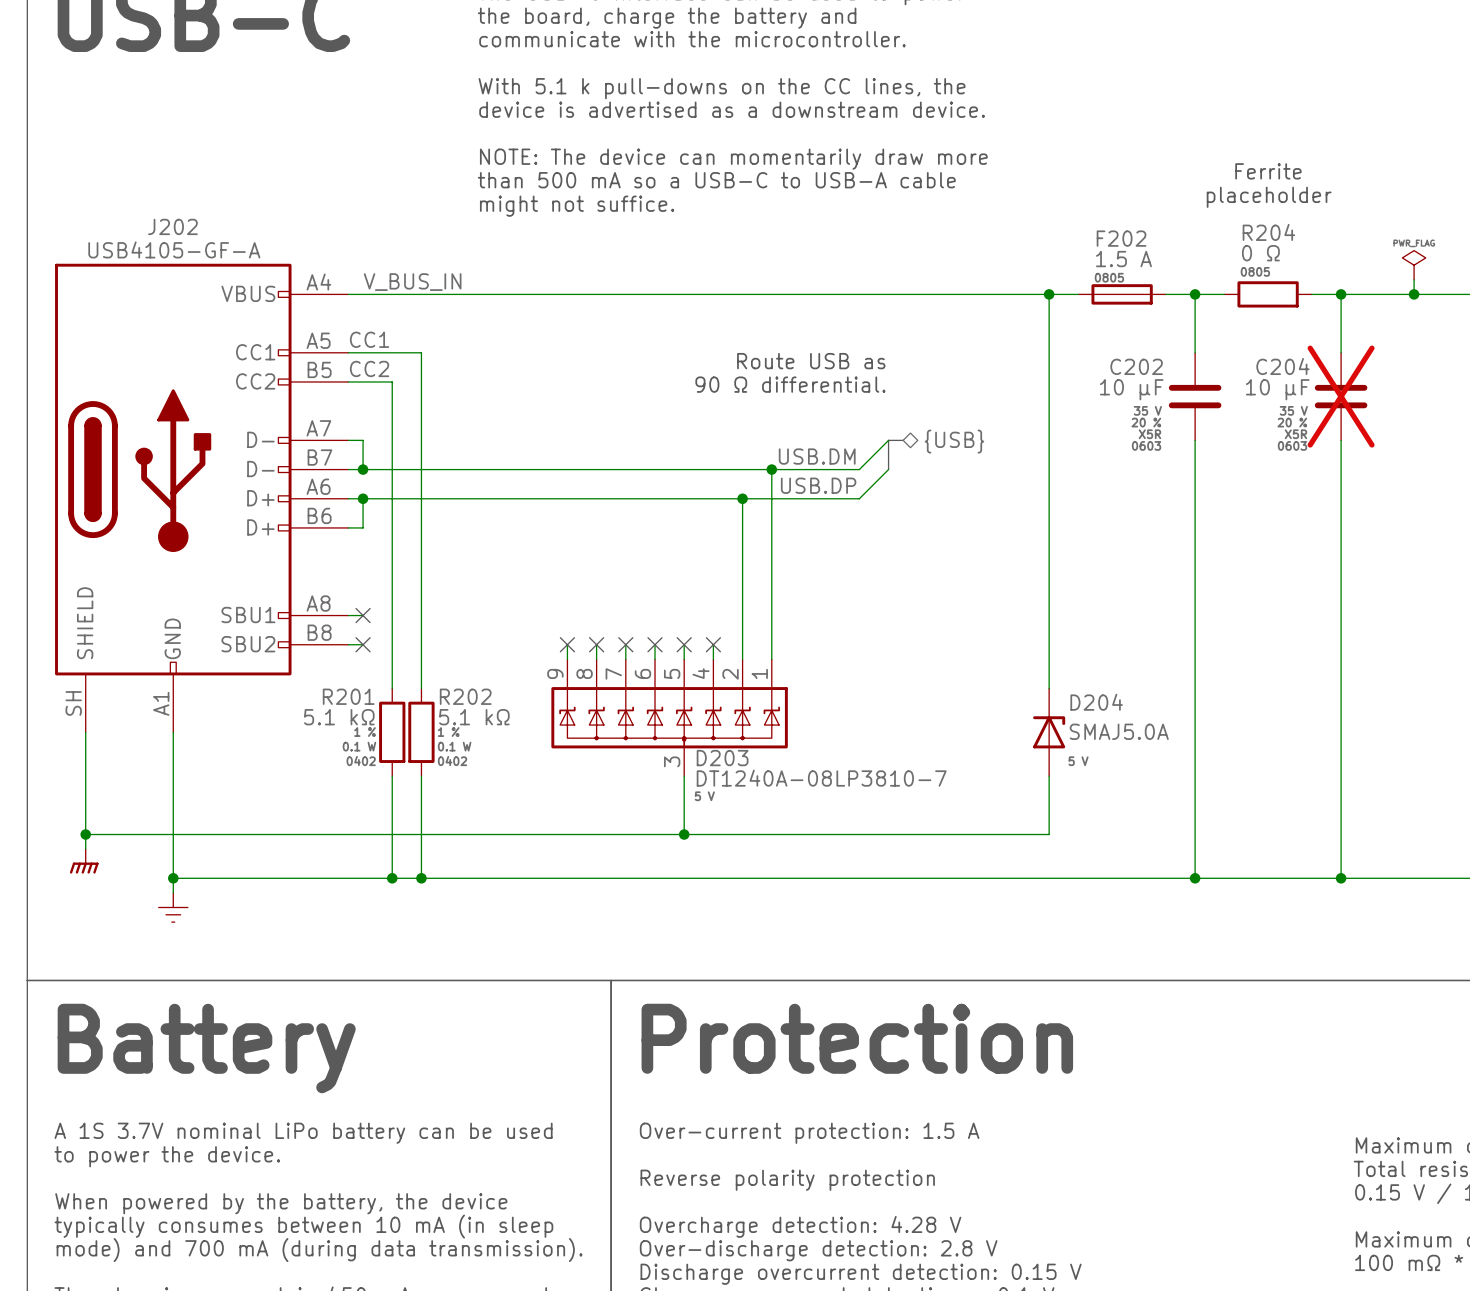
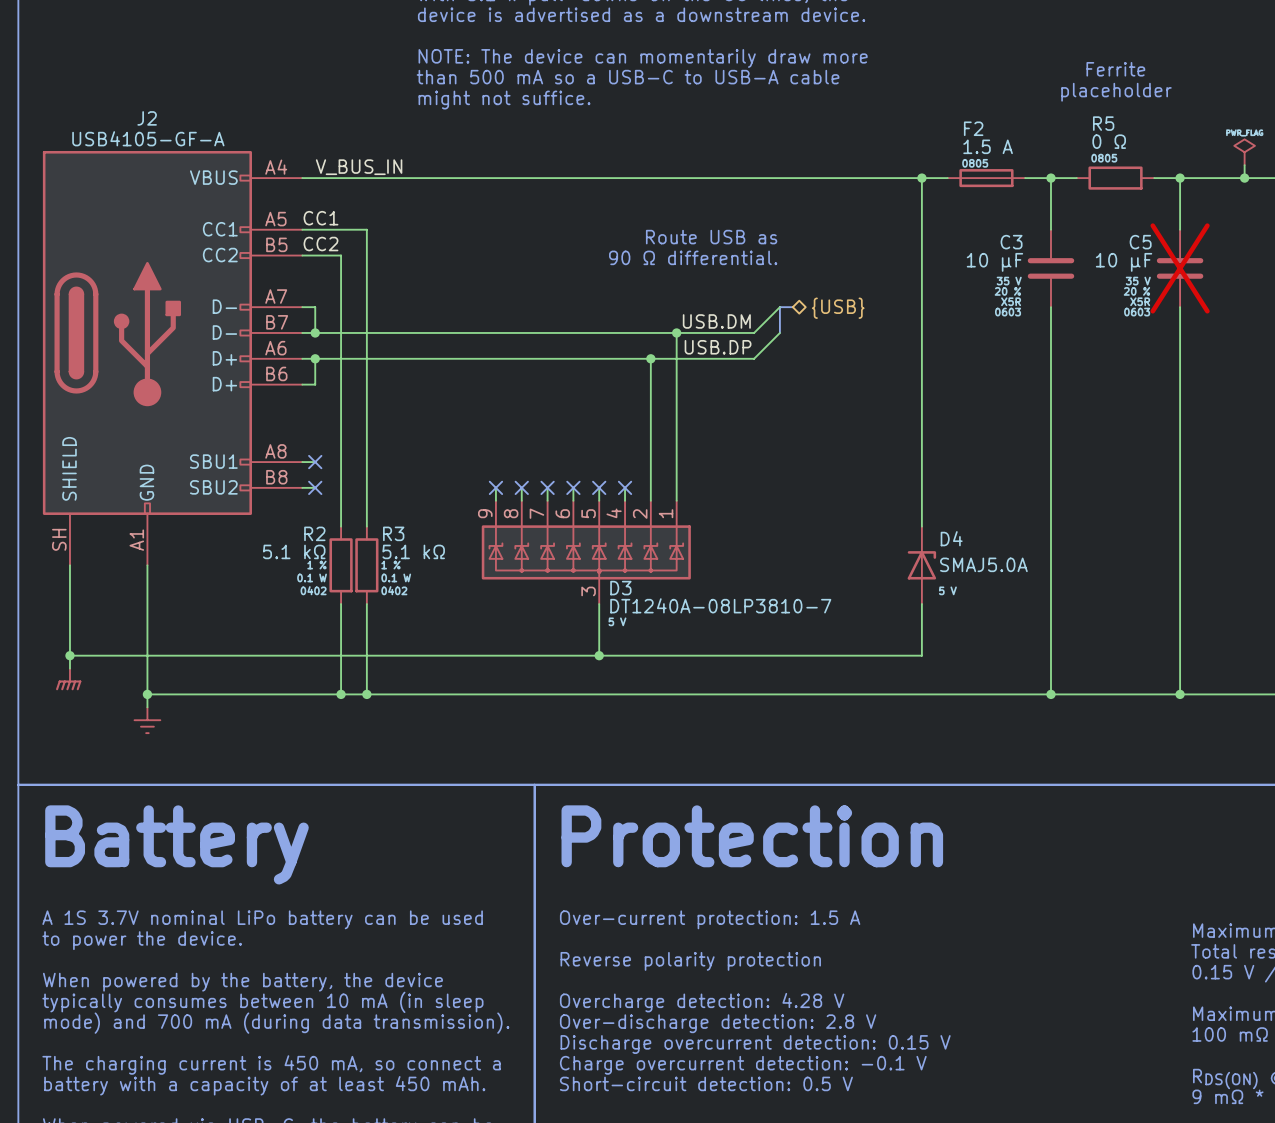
J202 name: J202 (172, 226) -> J2 (147, 118)
R204 name: R204 (1268, 232) -> R5 (1103, 123)
F202 name: F202 (1121, 238) -> F2 (973, 128)
C202 name: C202 (1136, 366) -> C3 (1011, 242)
C204 name: C204 (1282, 366) -> C5 (1140, 242)
R201 name: R201 (348, 696) -> R2 (314, 533)
R202 name: R202 (465, 696) -> R3 (393, 533)
D204 name: D204 (1096, 702) -> D4 (951, 538)
D203 name: D203 (722, 758) -> D3 (620, 588)

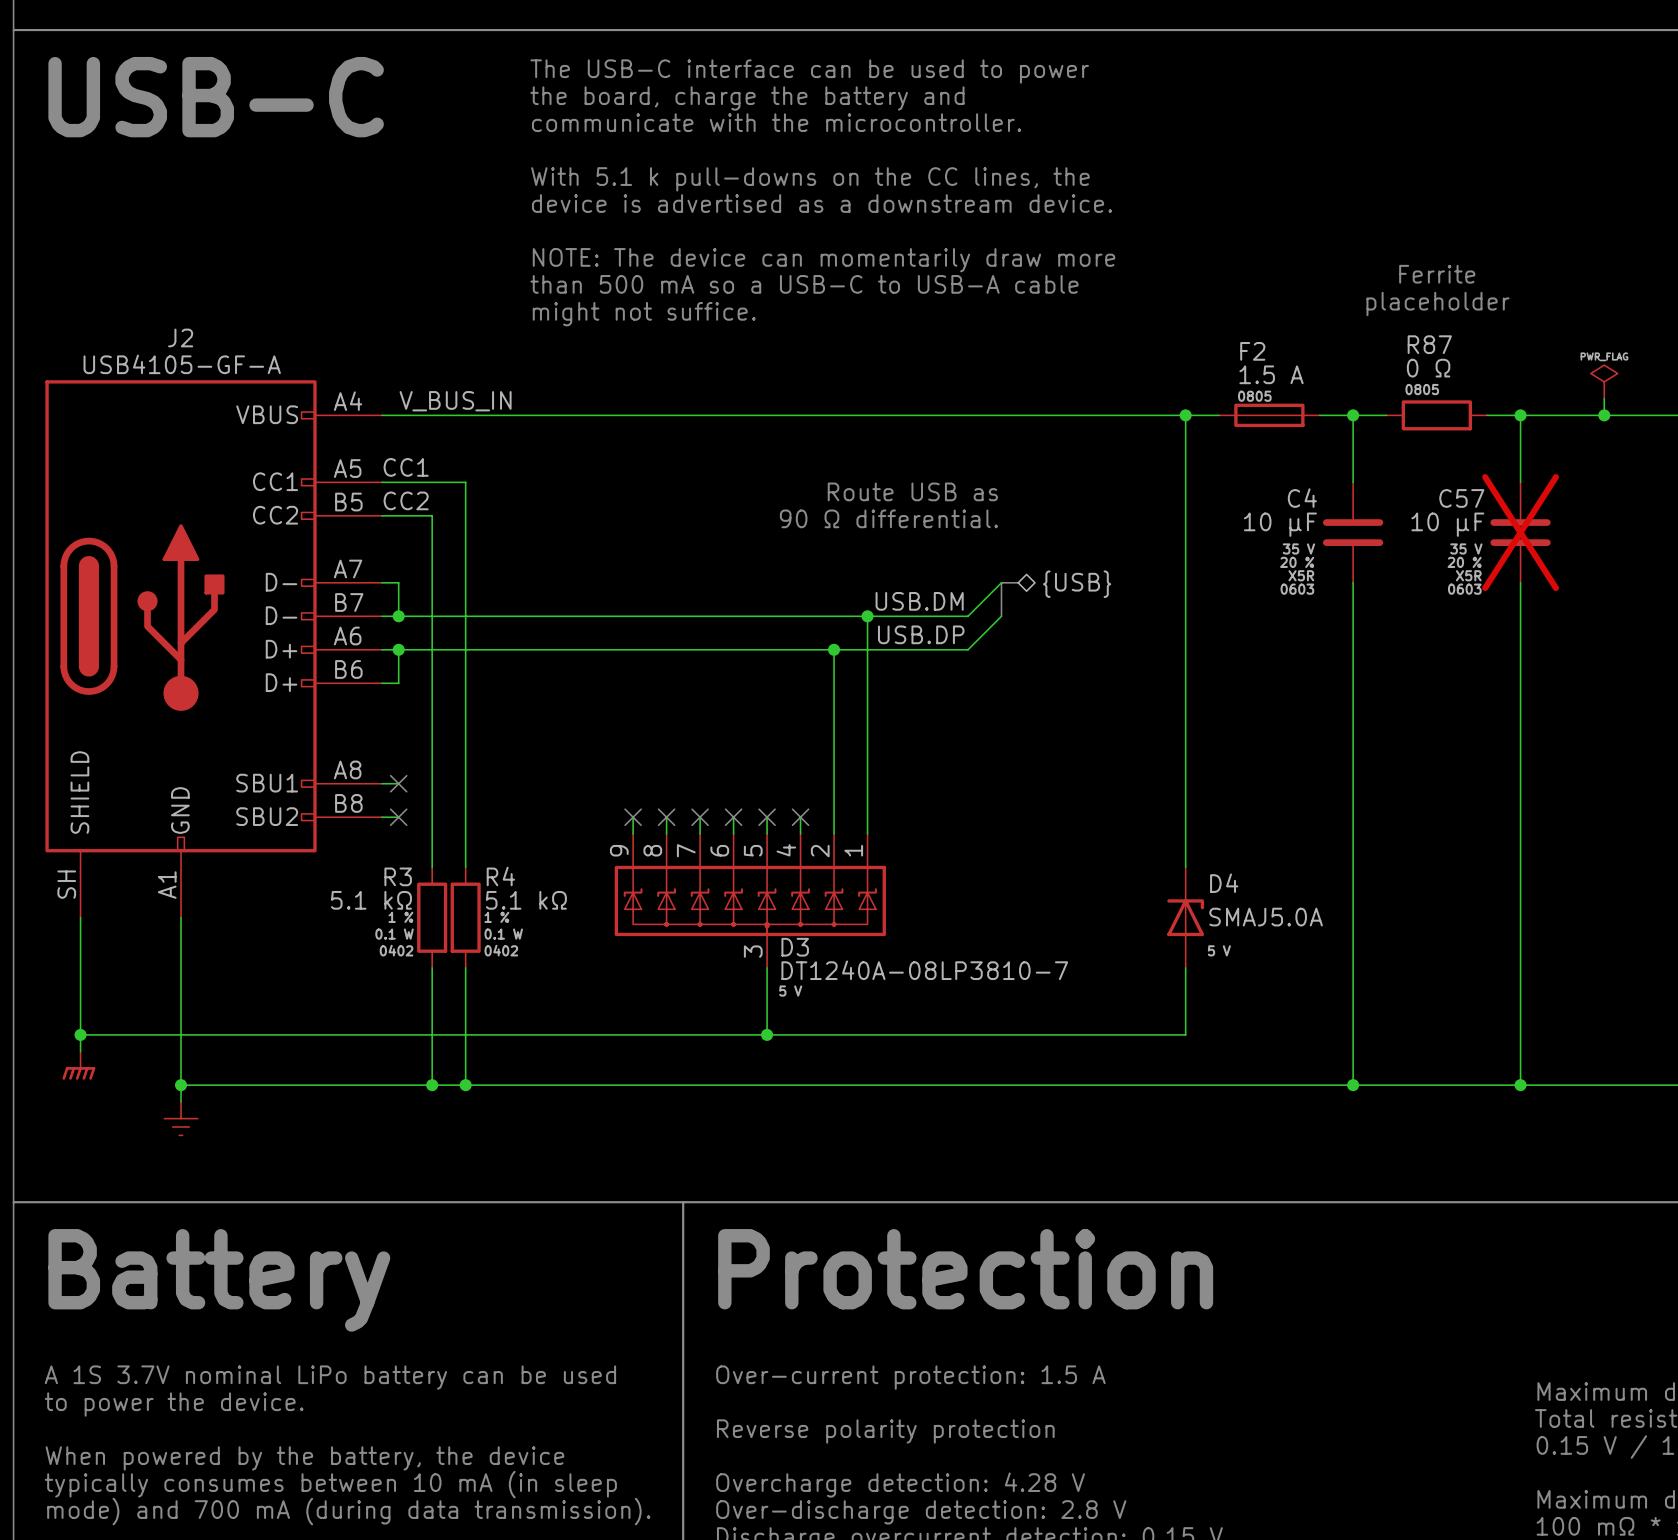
R5 name: R5 (1103, 123) -> R87 (1429, 344)
C3 name: C3 (1011, 242) -> C4 (1302, 498)
C5 name: C5 (1140, 242) -> C57 (1461, 498)
R2 name: R2 (314, 533) -> R3 (398, 876)
R3 name: R3 (393, 533) -> R4 (500, 876)

